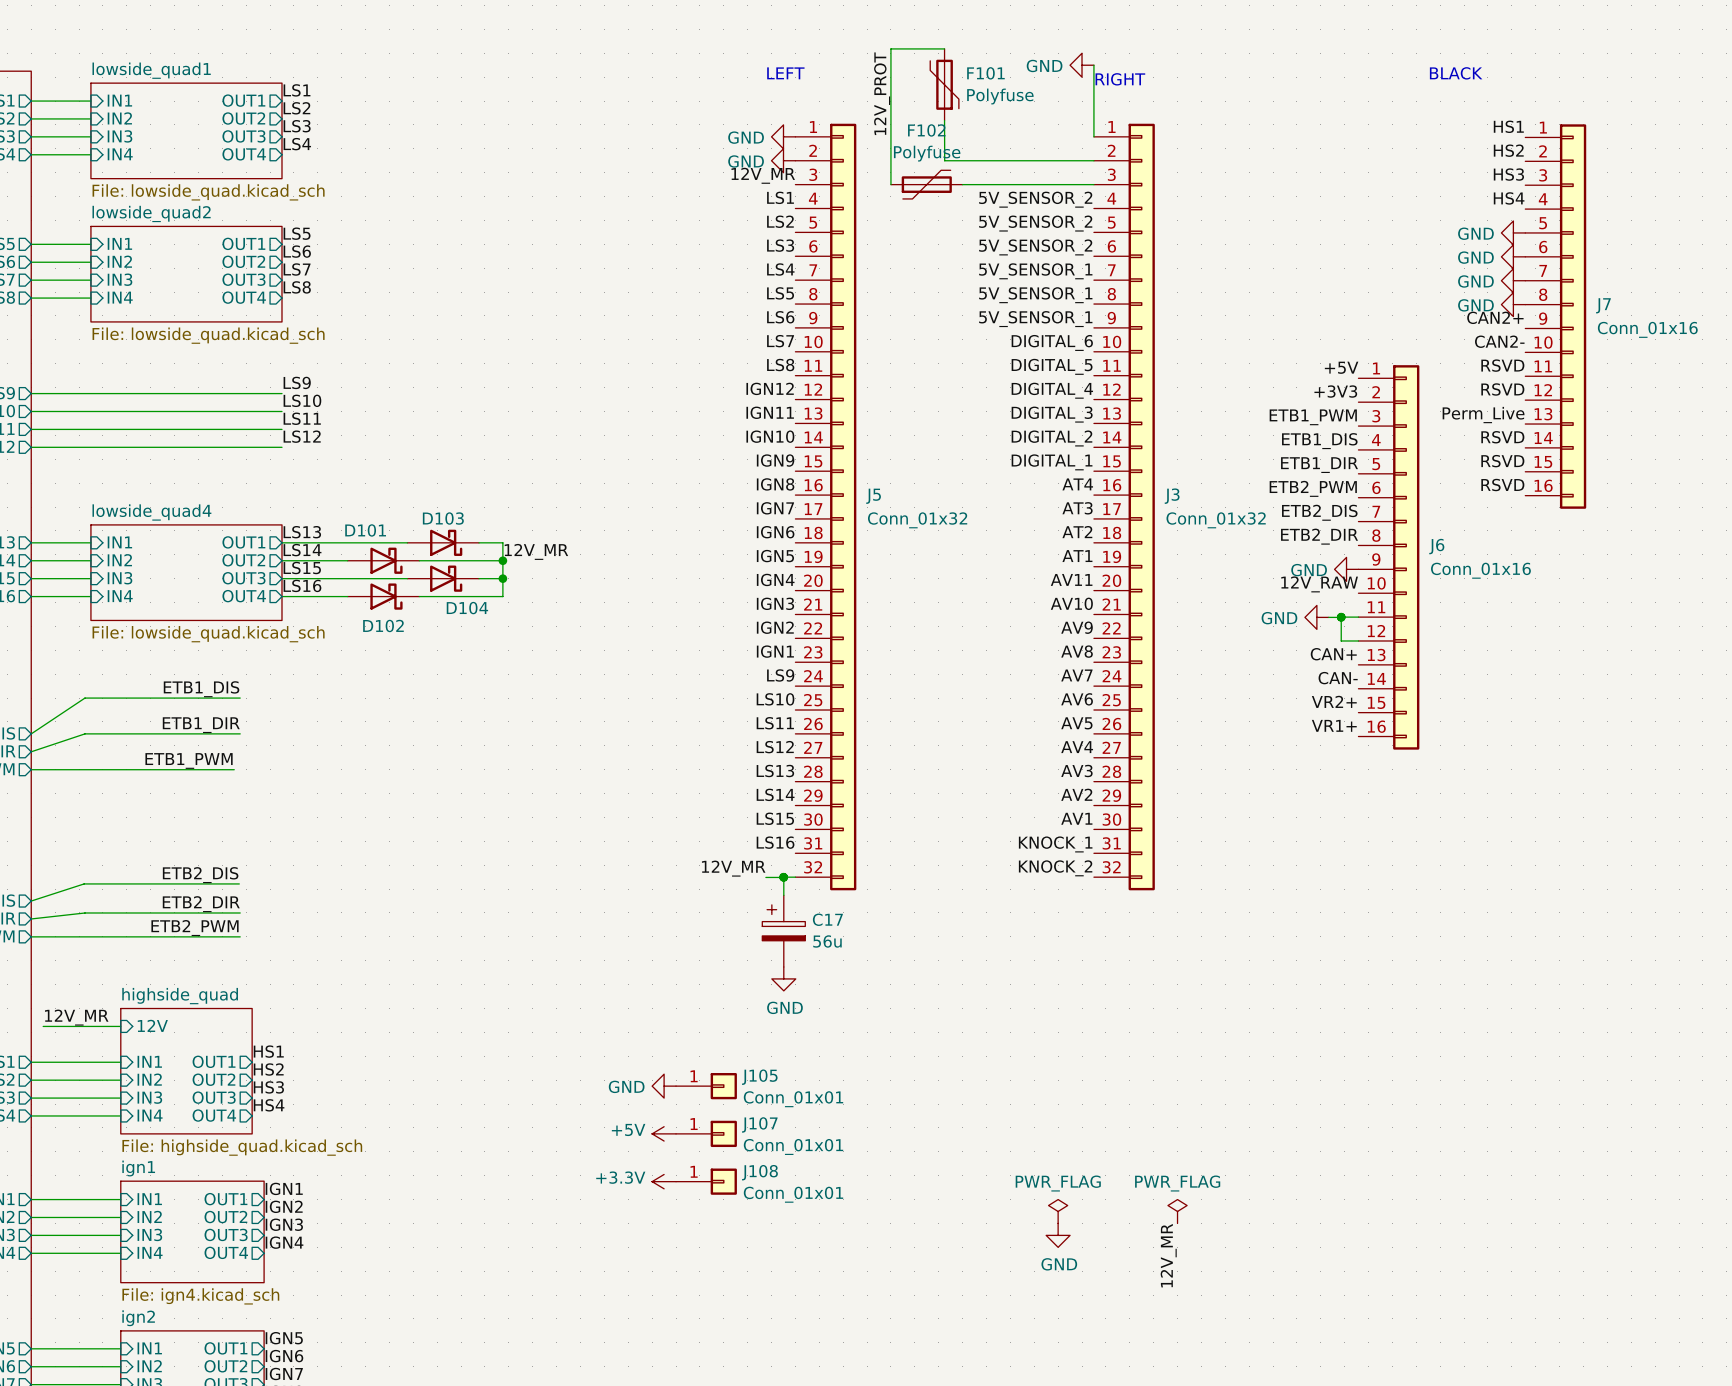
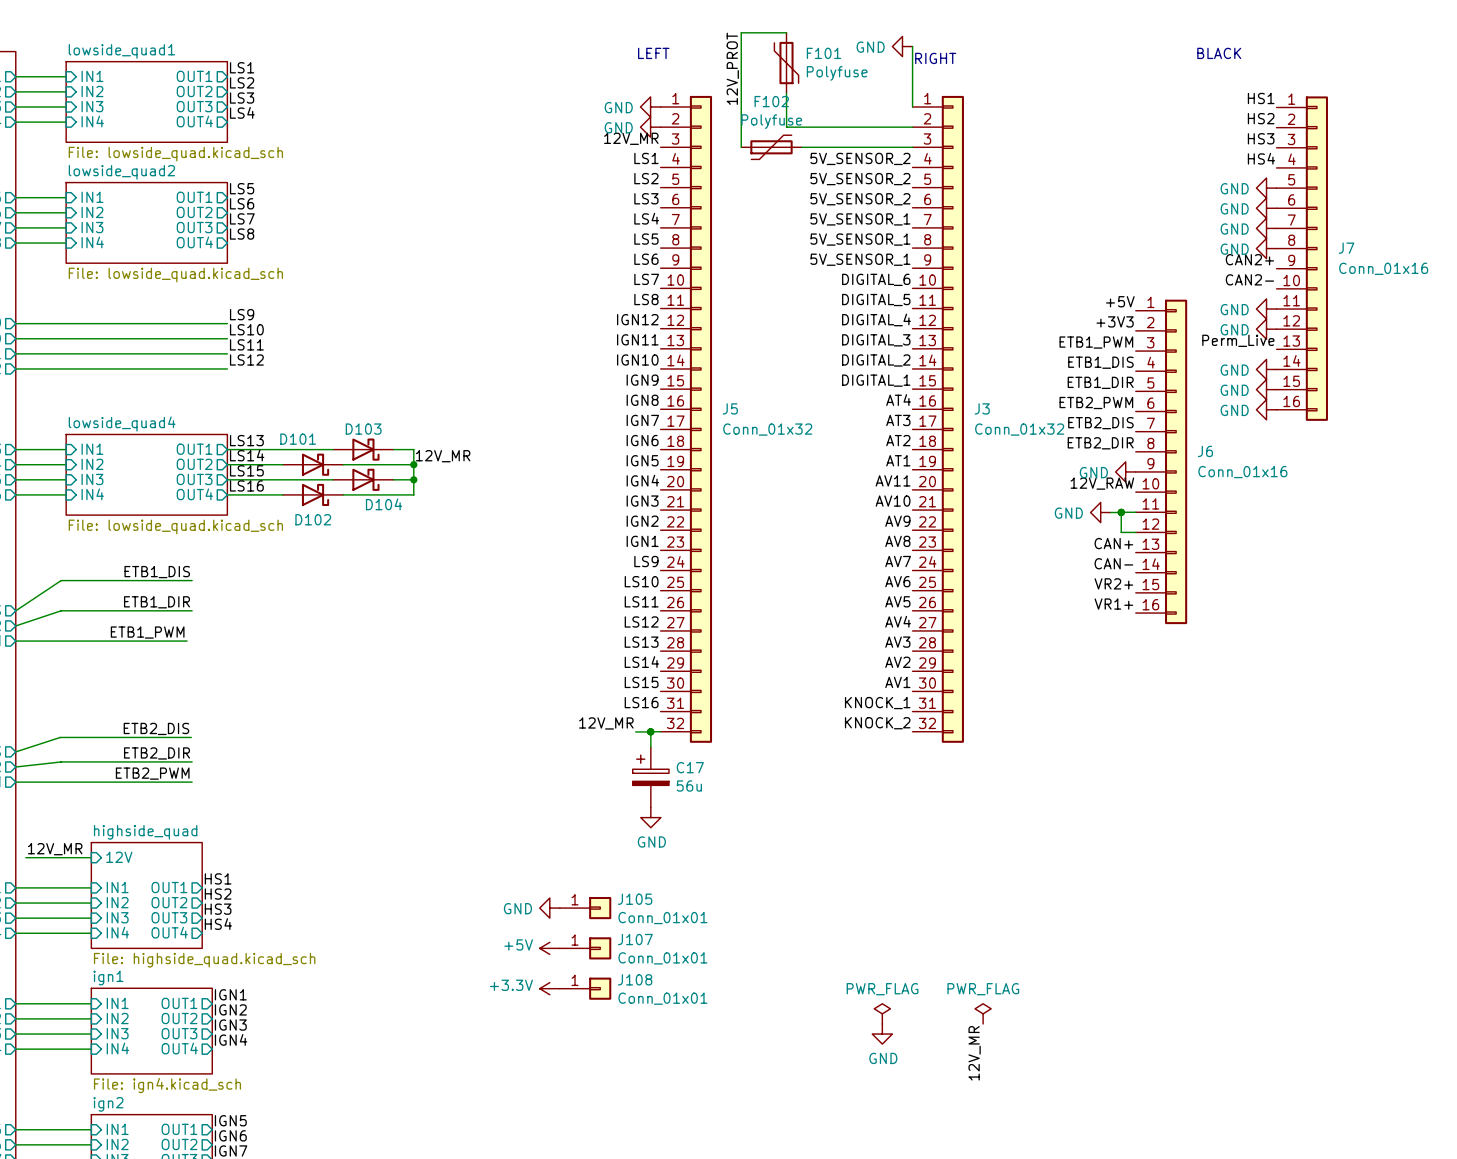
label: RSVD (1502, 365) -> none
power symbol: none -> GND (1266, 309)
label: RSVD (1502, 389) -> none
power symbol: none -> GND (1266, 329)
label: RSVD (1502, 437) -> none
power symbol: none -> GND (1266, 369)
label: RSVD (1502, 461) -> none
power symbol: none -> GND (1266, 389)
label: RSVD (1502, 485) -> none
power symbol: none -> GND (1266, 409)

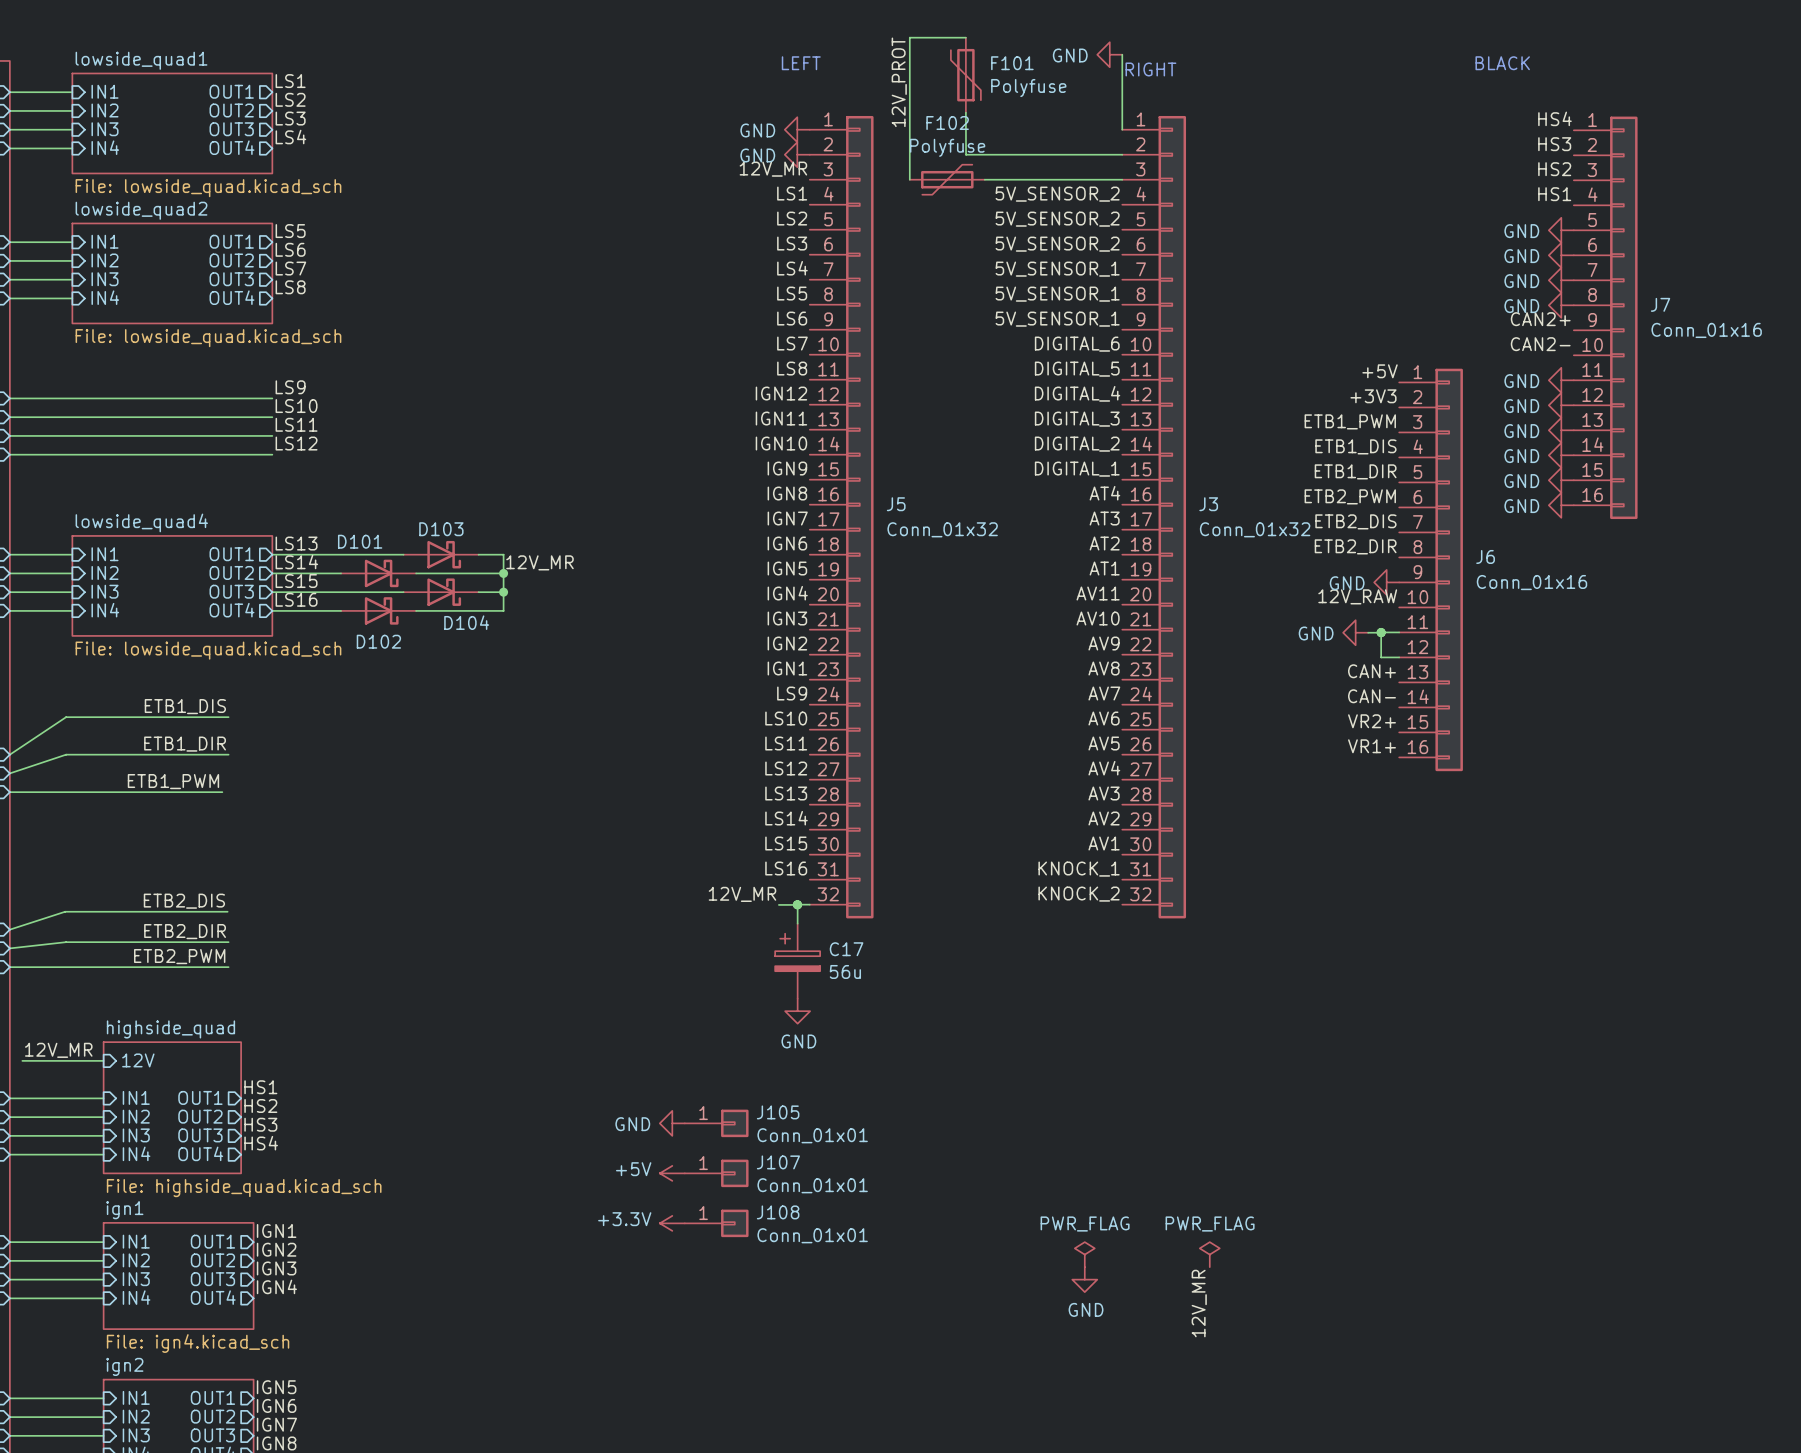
label: HS1 (1261, 98) -> HS4 (1554, 118)
label: HS2 (1261, 118) -> HS3 (1554, 144)
label: HS3 (1261, 138) -> HS2 (1554, 169)
label: HS4 (1261, 158) -> HS1 (1554, 194)
label: Perm_Live (1238, 340) -> none
power symbol: none -> GND (1561, 430)

